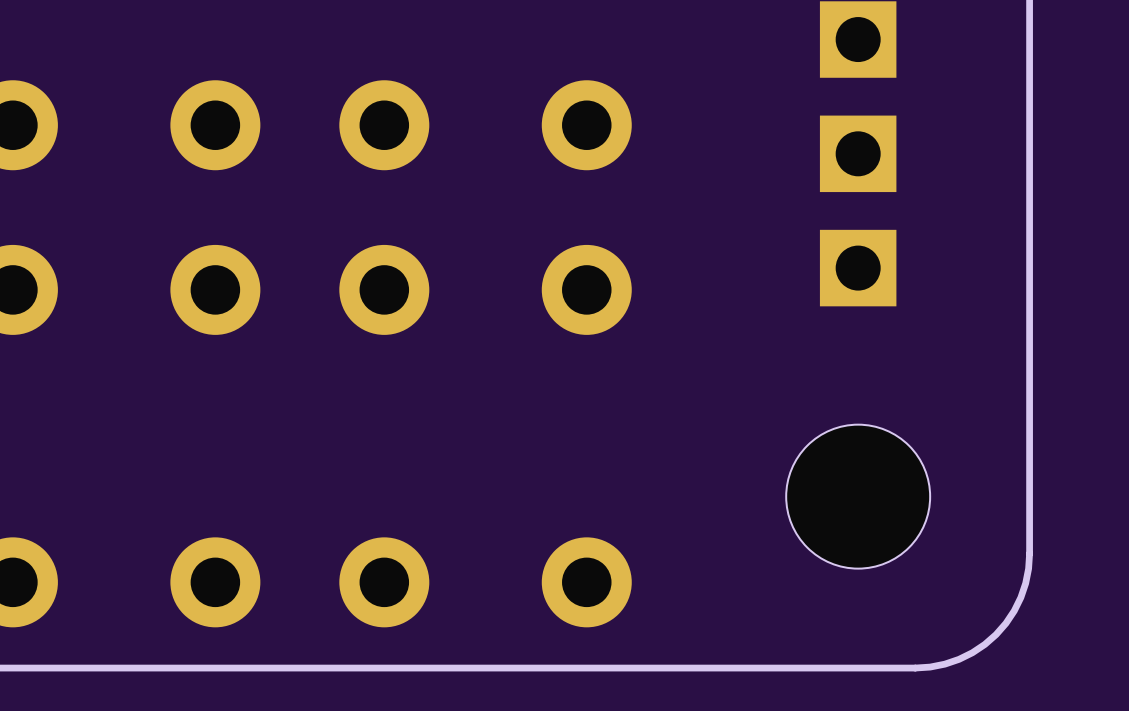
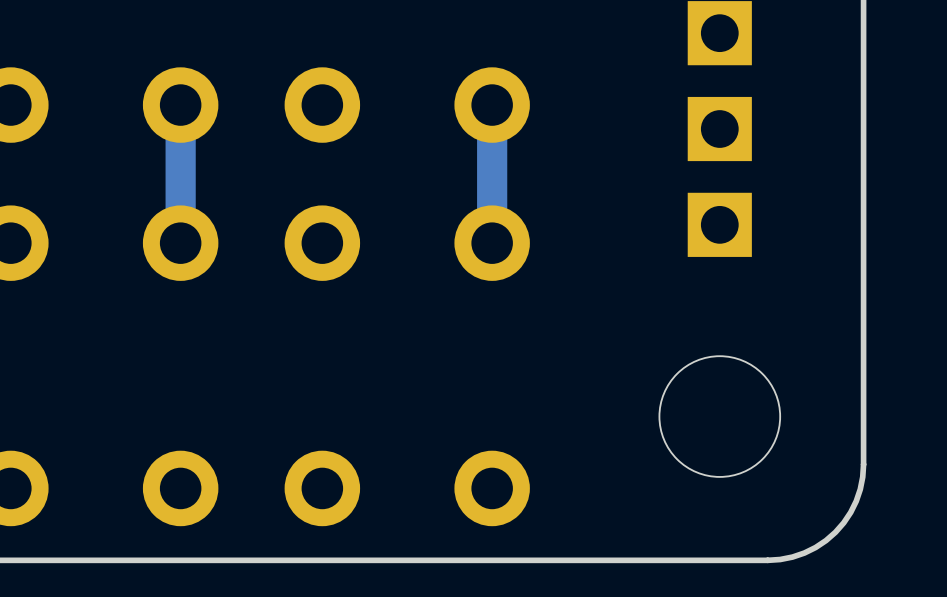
track: none -> (180, 105) (180, 243)
track: none -> (492, 105) (492, 243)

